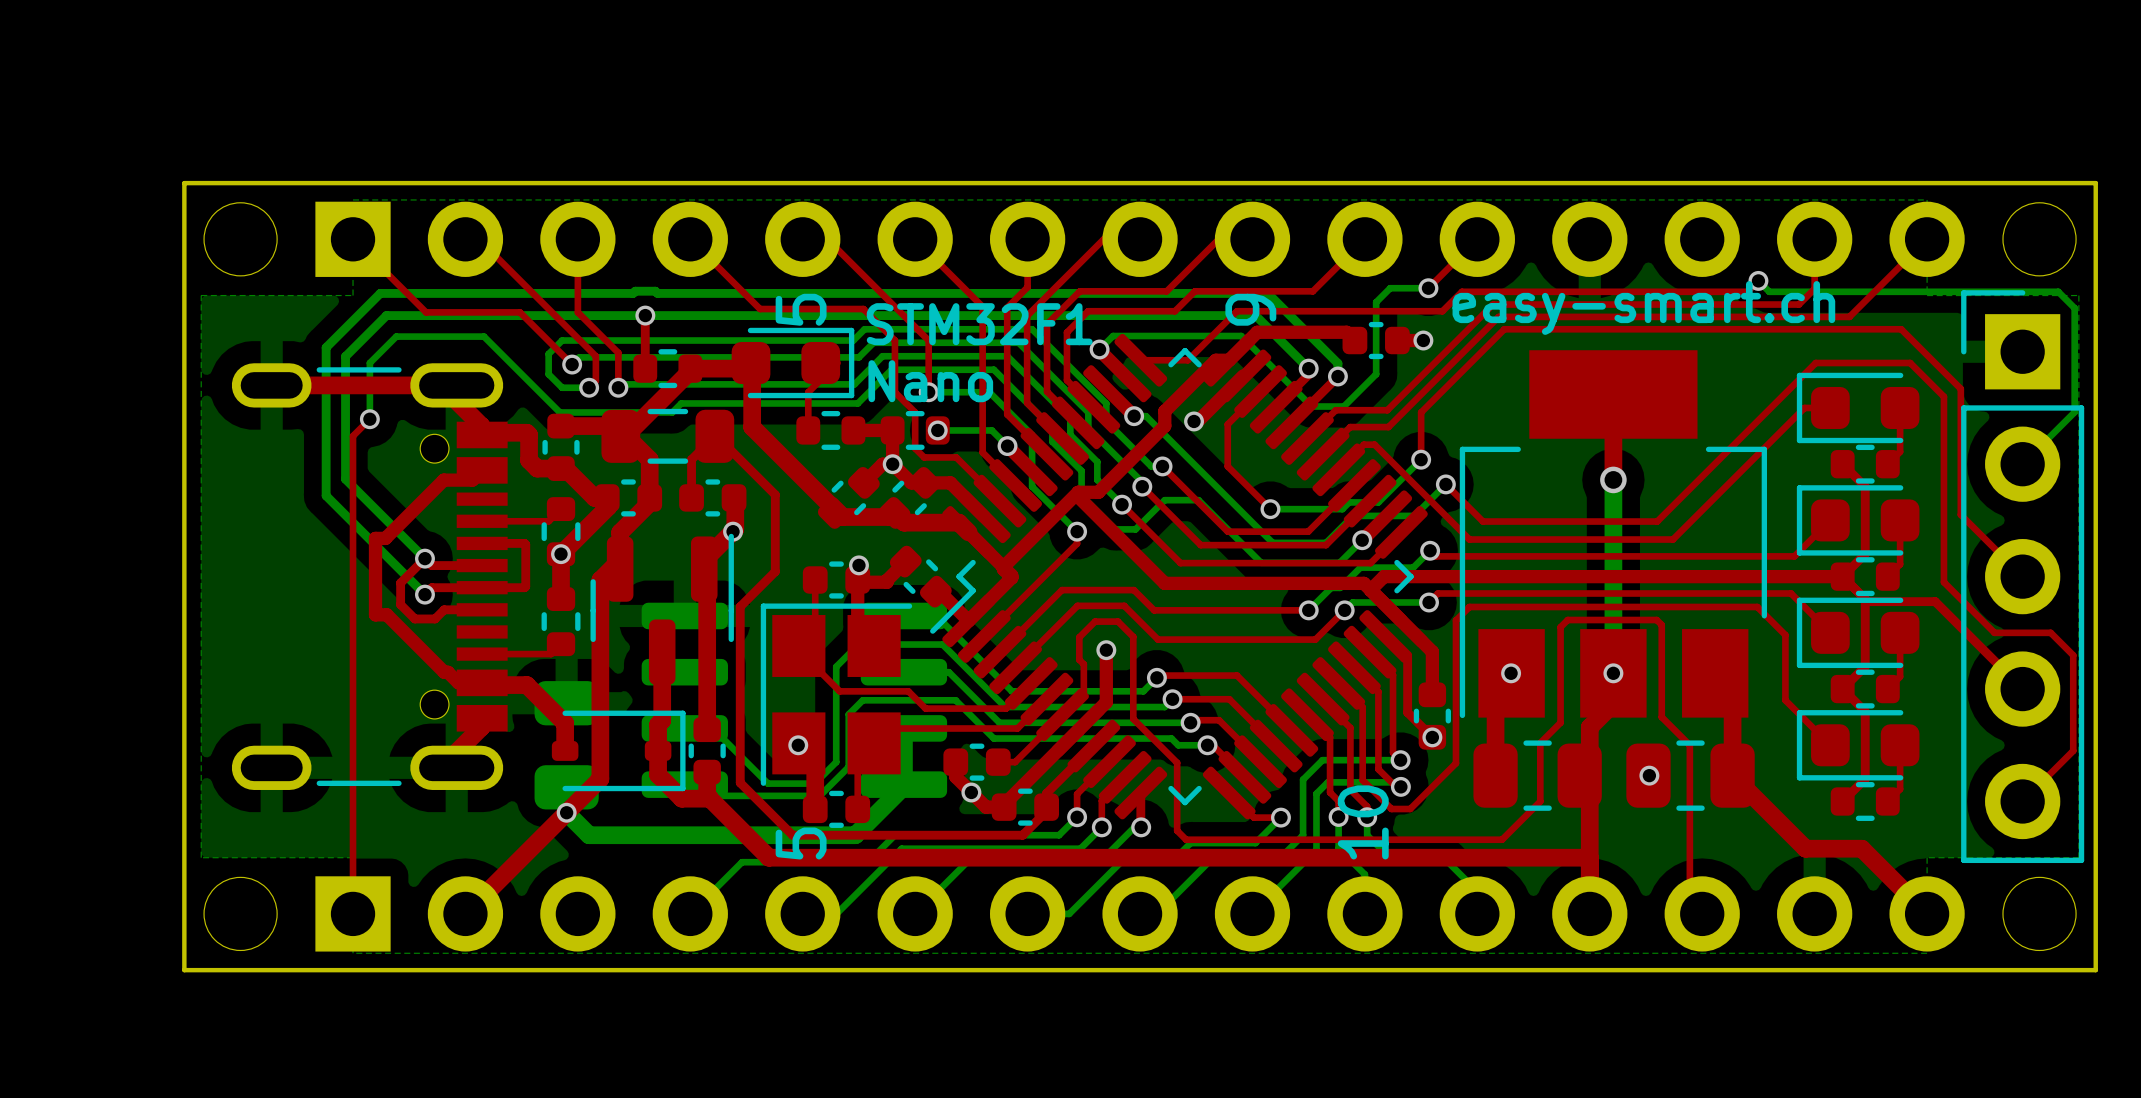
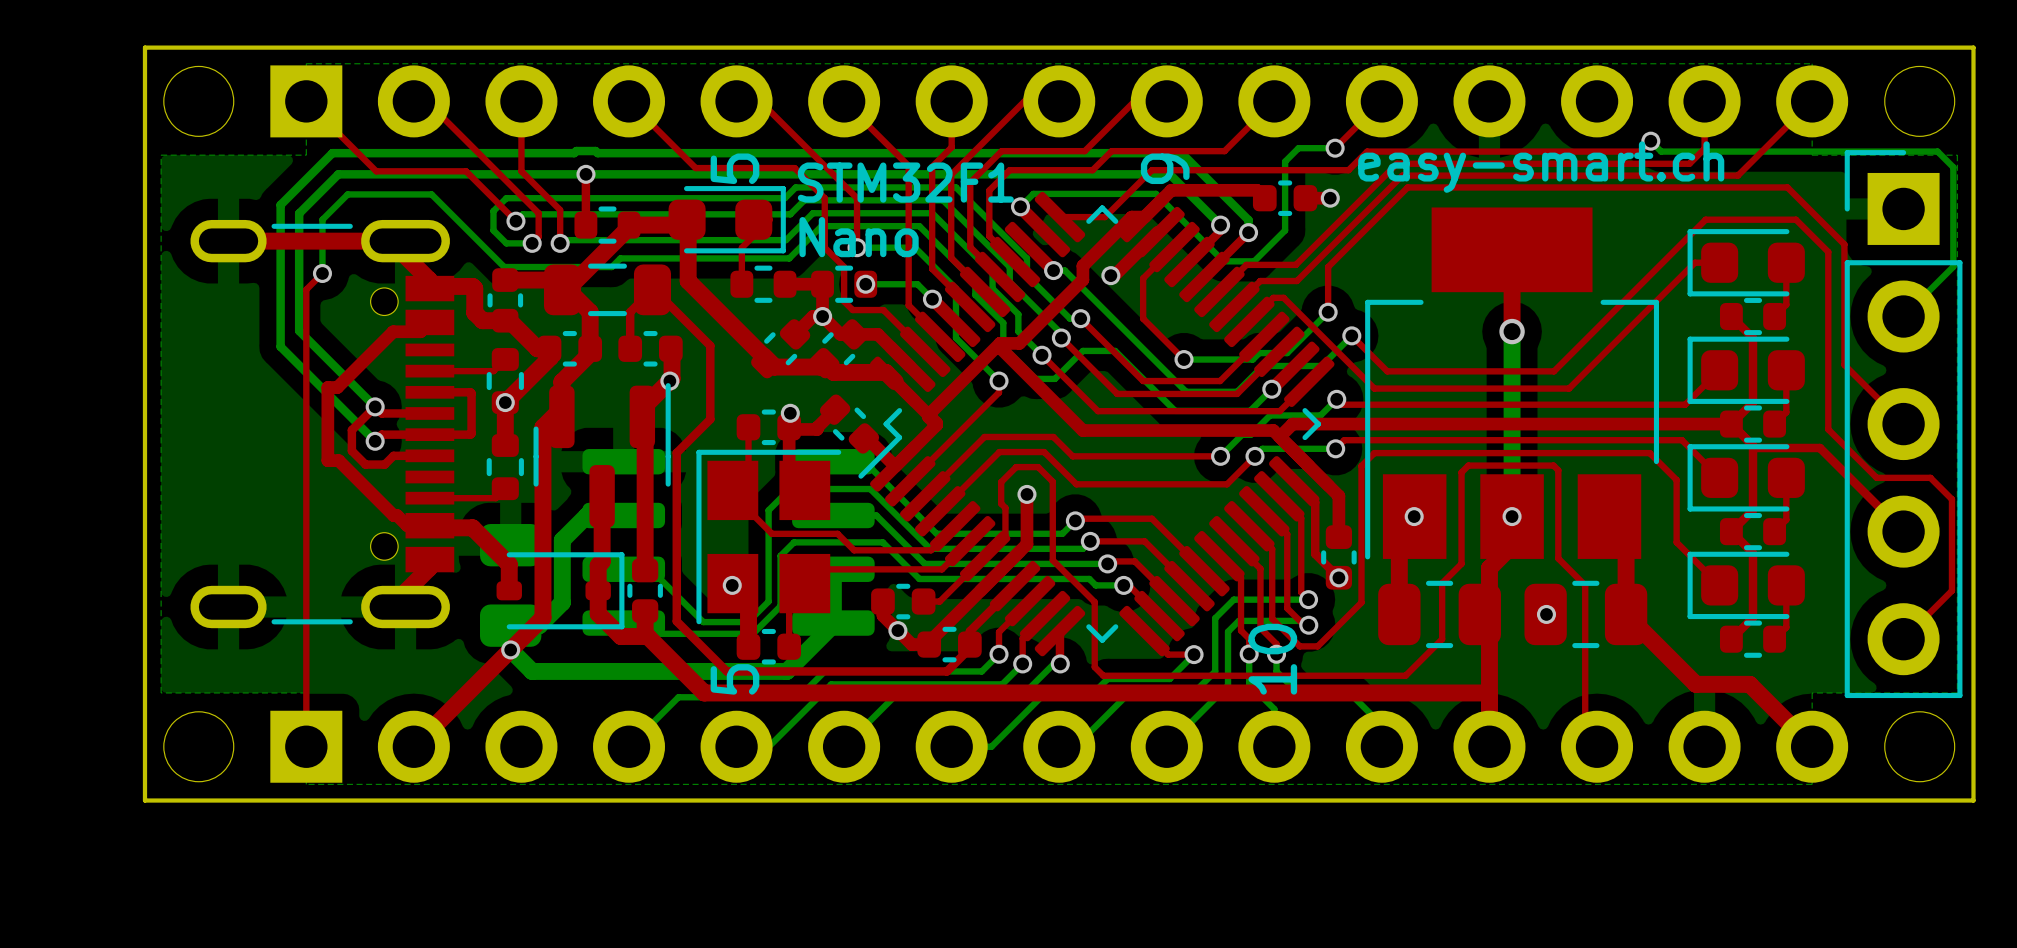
bottom track: none -> (623, 515) (587, 515) (562, 540) (562, 602) (539, 625) (510, 625)

